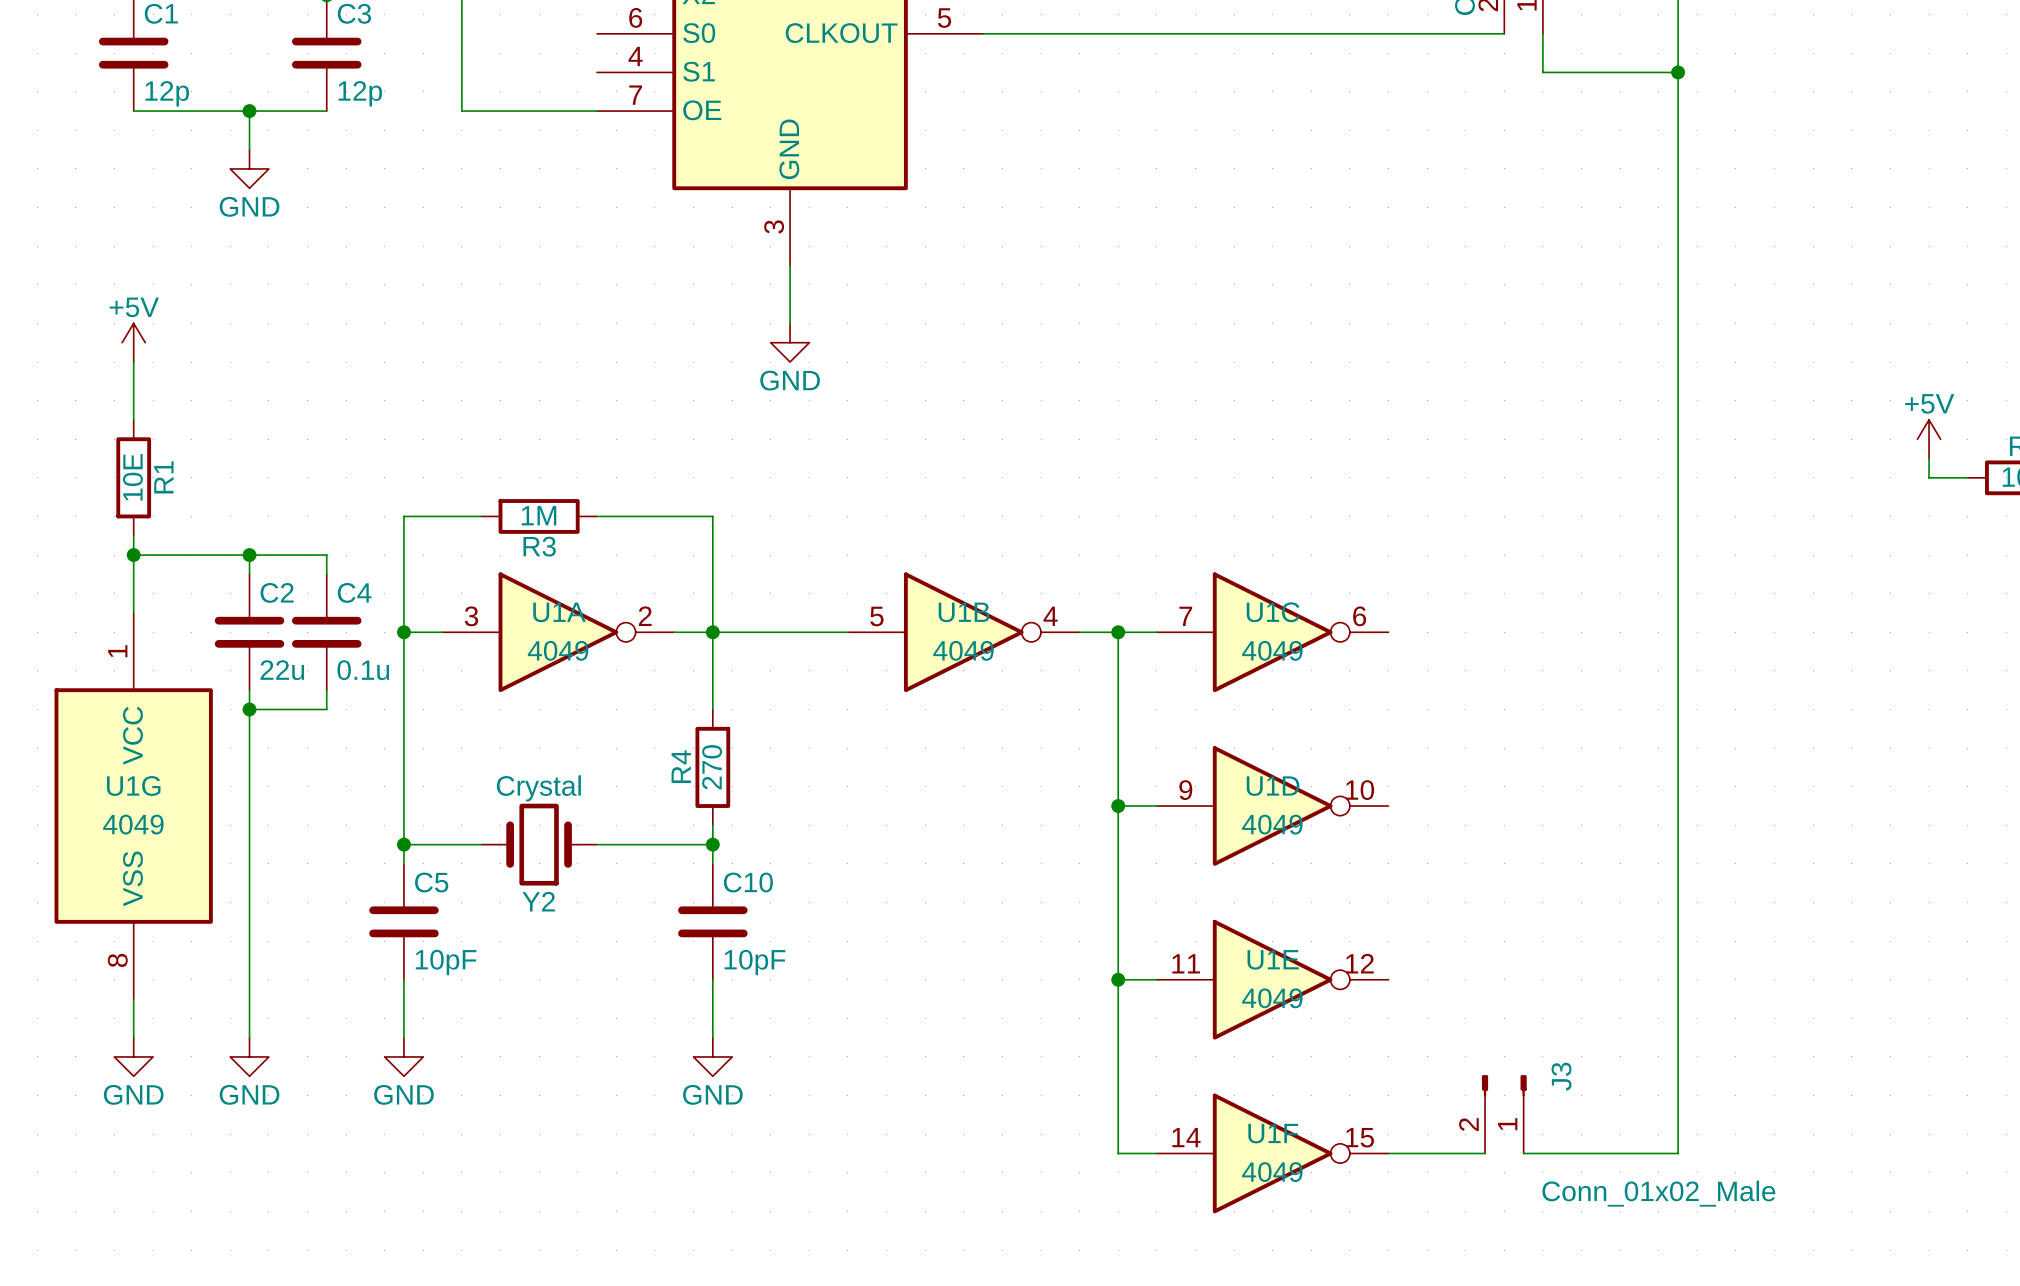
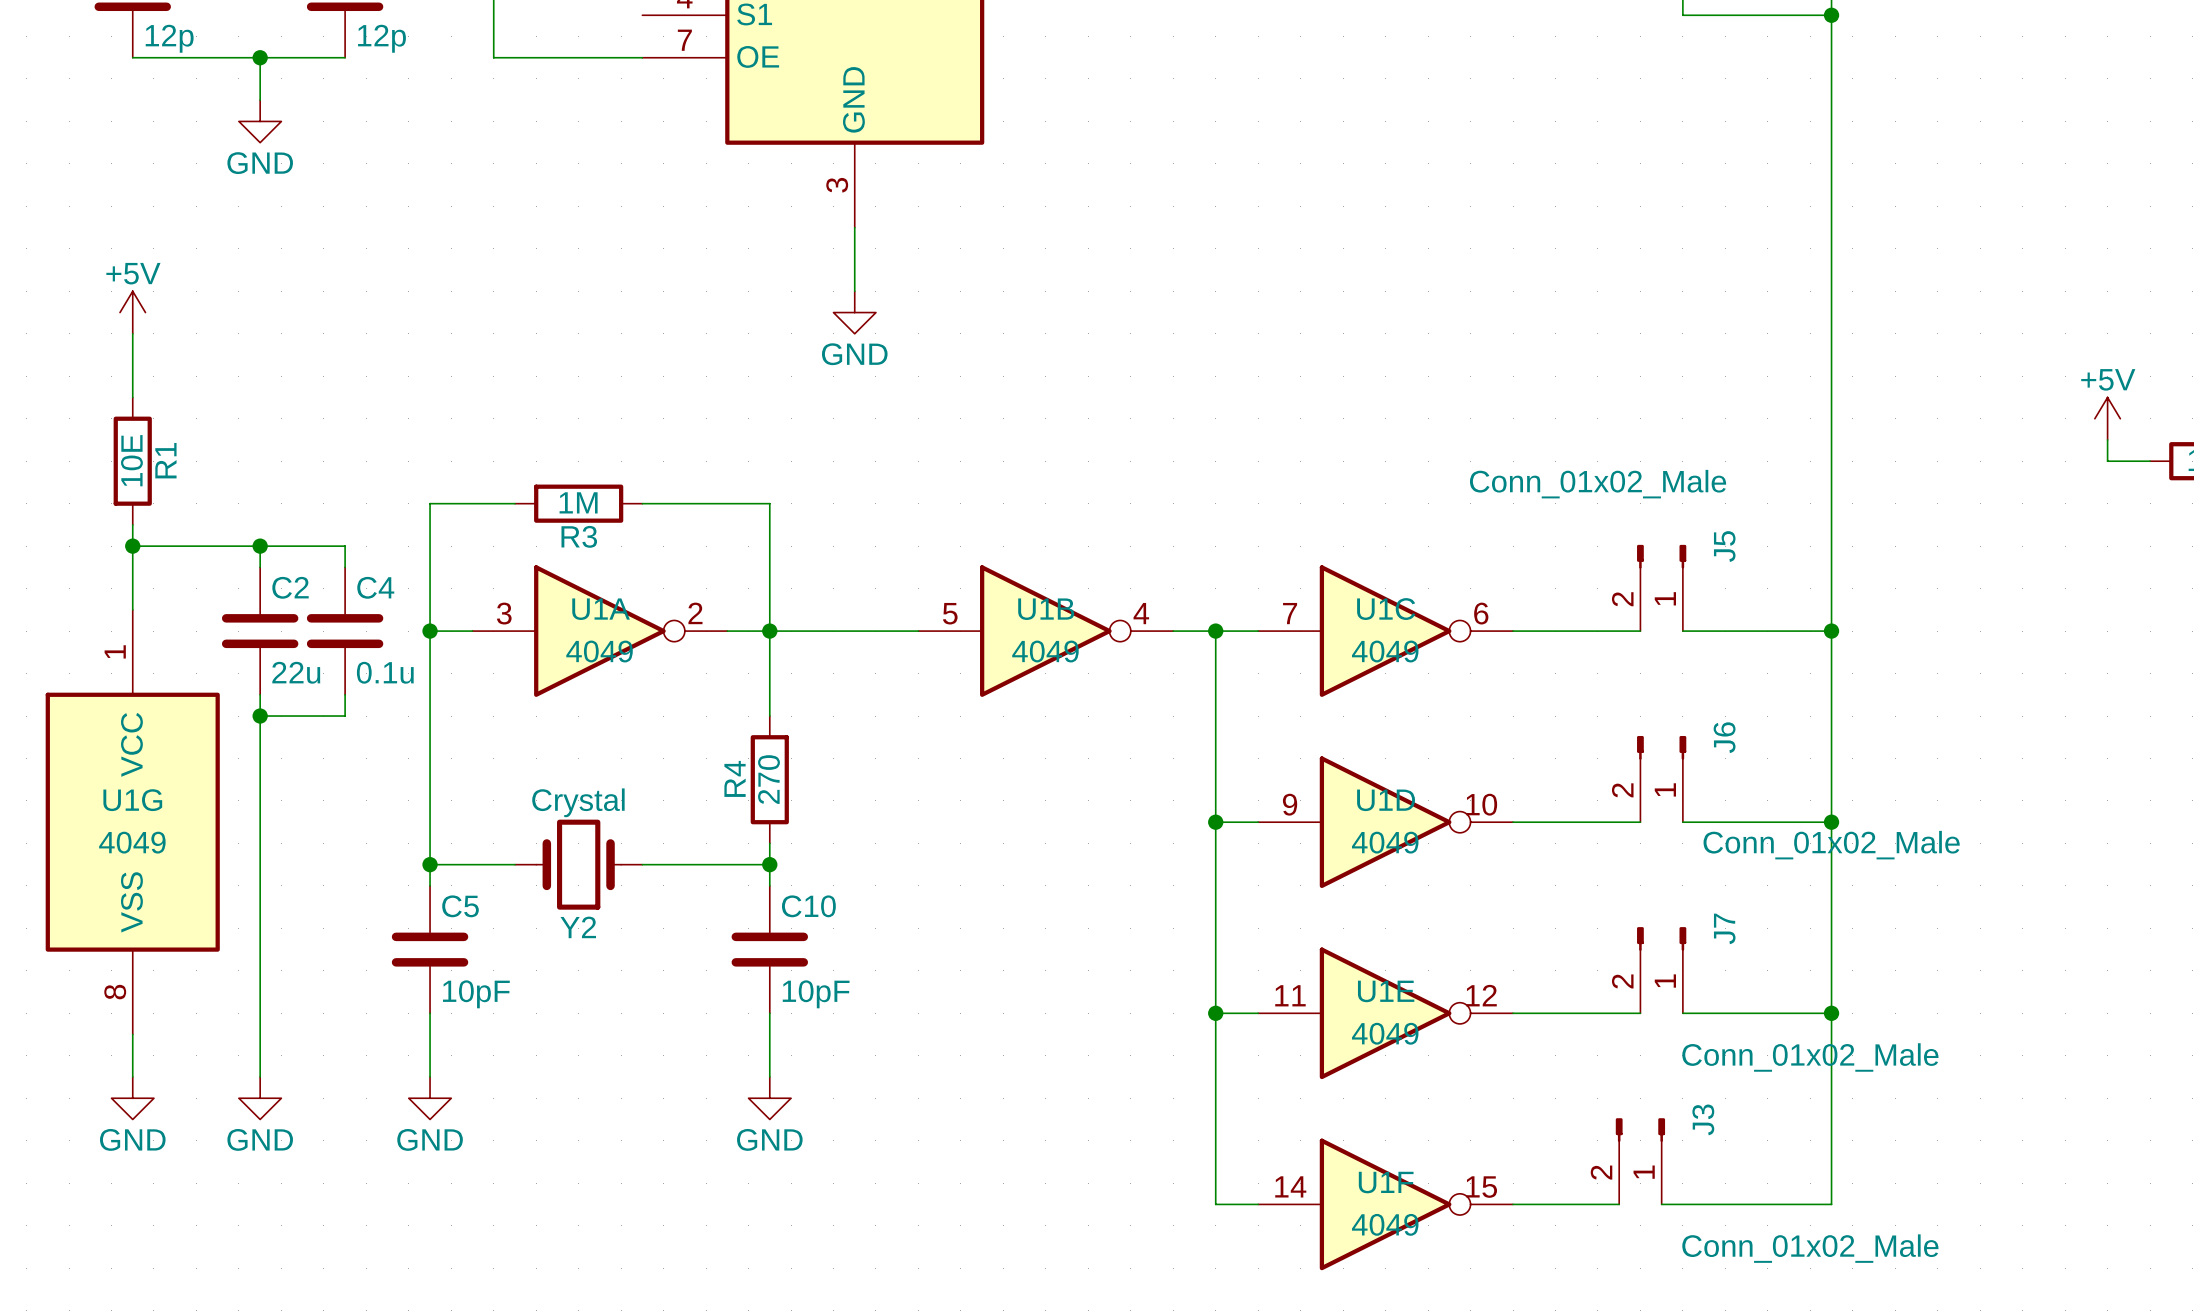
J5: none -> Conn_01x02_Male (1661, 587)
wire: none -> (1513, 631) (1640, 631)
wire: none -> (1682, 631) (1831, 631)
junction: none -> (1831, 631)
J6: none -> Conn_01x02_Male (1661, 779)
wire: none -> (1513, 822) (1640, 822)
wire: none -> (1682, 822) (1831, 822)
junction: none -> (1831, 822)
J7: none -> Conn_01x02_Male (1661, 970)
wire: none -> (1513, 1013) (1640, 1013)
wire: none -> (1682, 1013) (1831, 1013)
junction: none -> (1831, 1013)

